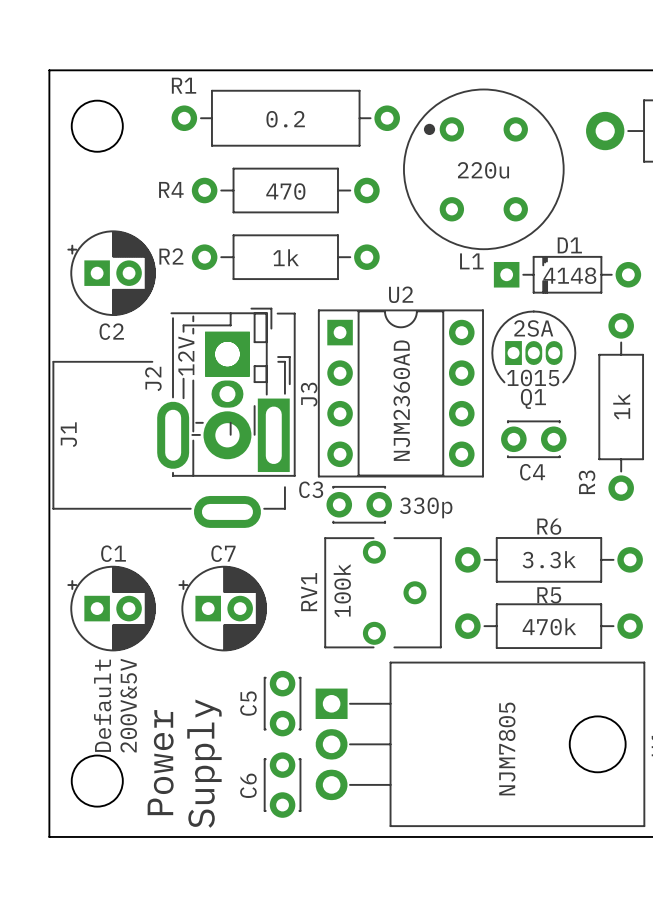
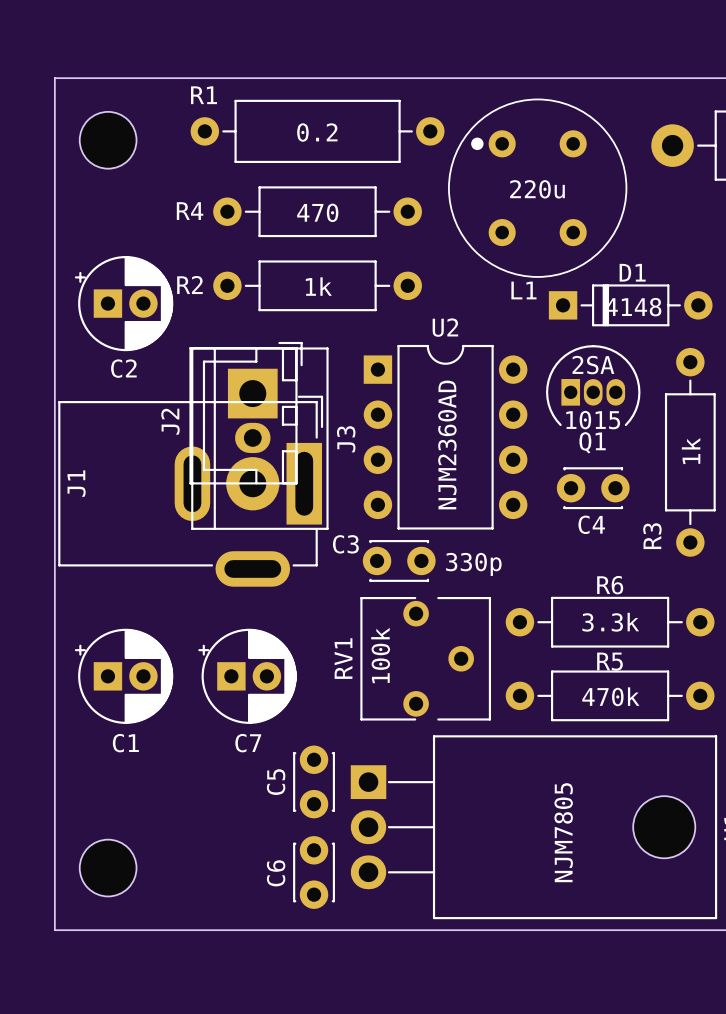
D1 footprint: [493, 255, 642, 294] -> [548, 284, 713, 327]
J2 footprint: [170, 307, 273, 436] -> [189, 341, 303, 485]
U2 footprint: [317, 309, 484, 478] -> [363, 344, 528, 530]
J3 footprint: [172, 312, 296, 477] -> [191, 347, 329, 530]
J1 footprint: [52, 356, 291, 528] -> [58, 395, 324, 587]
text: 12V (186, 356) -> none
C1 name position: C1 (113, 553) -> C1 (125, 743)
C7 name position: C7 (223, 553) -> C7 (248, 743)
text: Default (102, 705) -> none
text: 200V&5V (128, 705) -> none
text: Power (160, 762) -> none
text: Supply (204, 763) -> none

